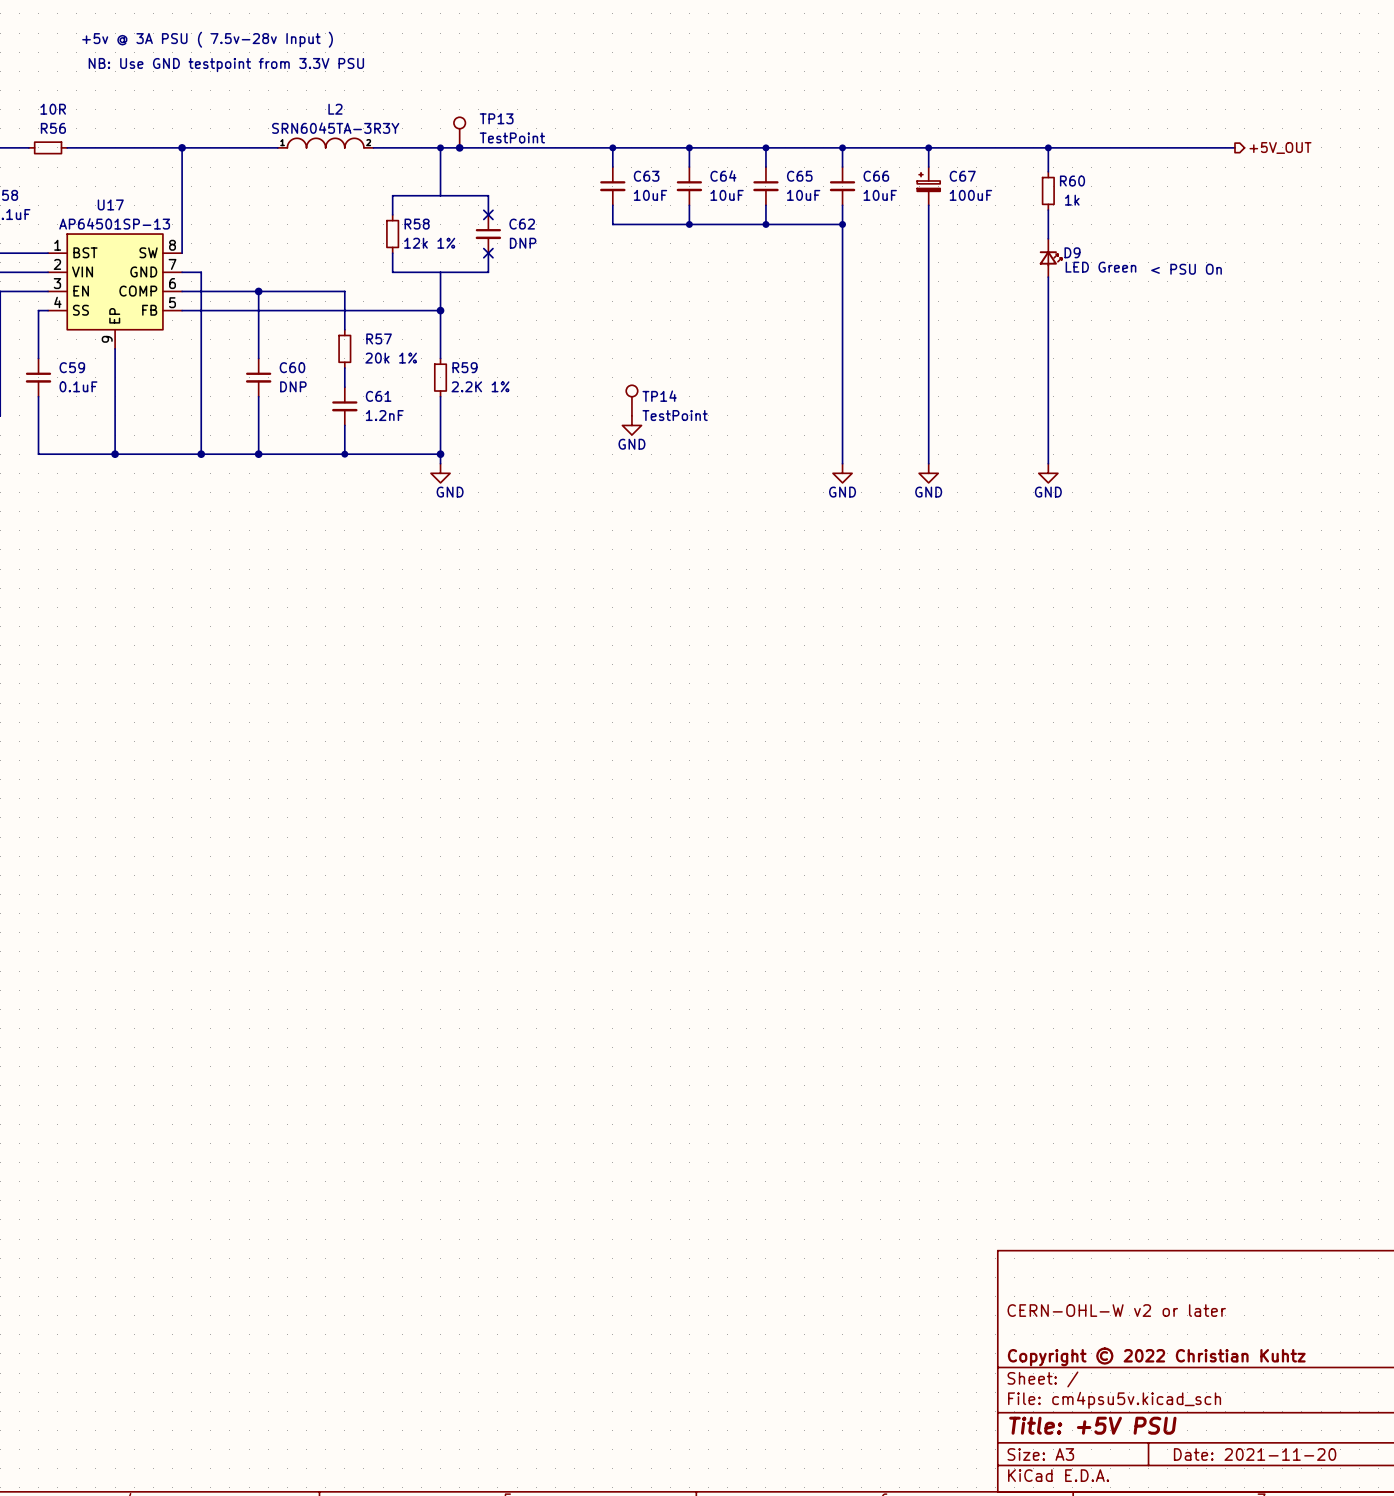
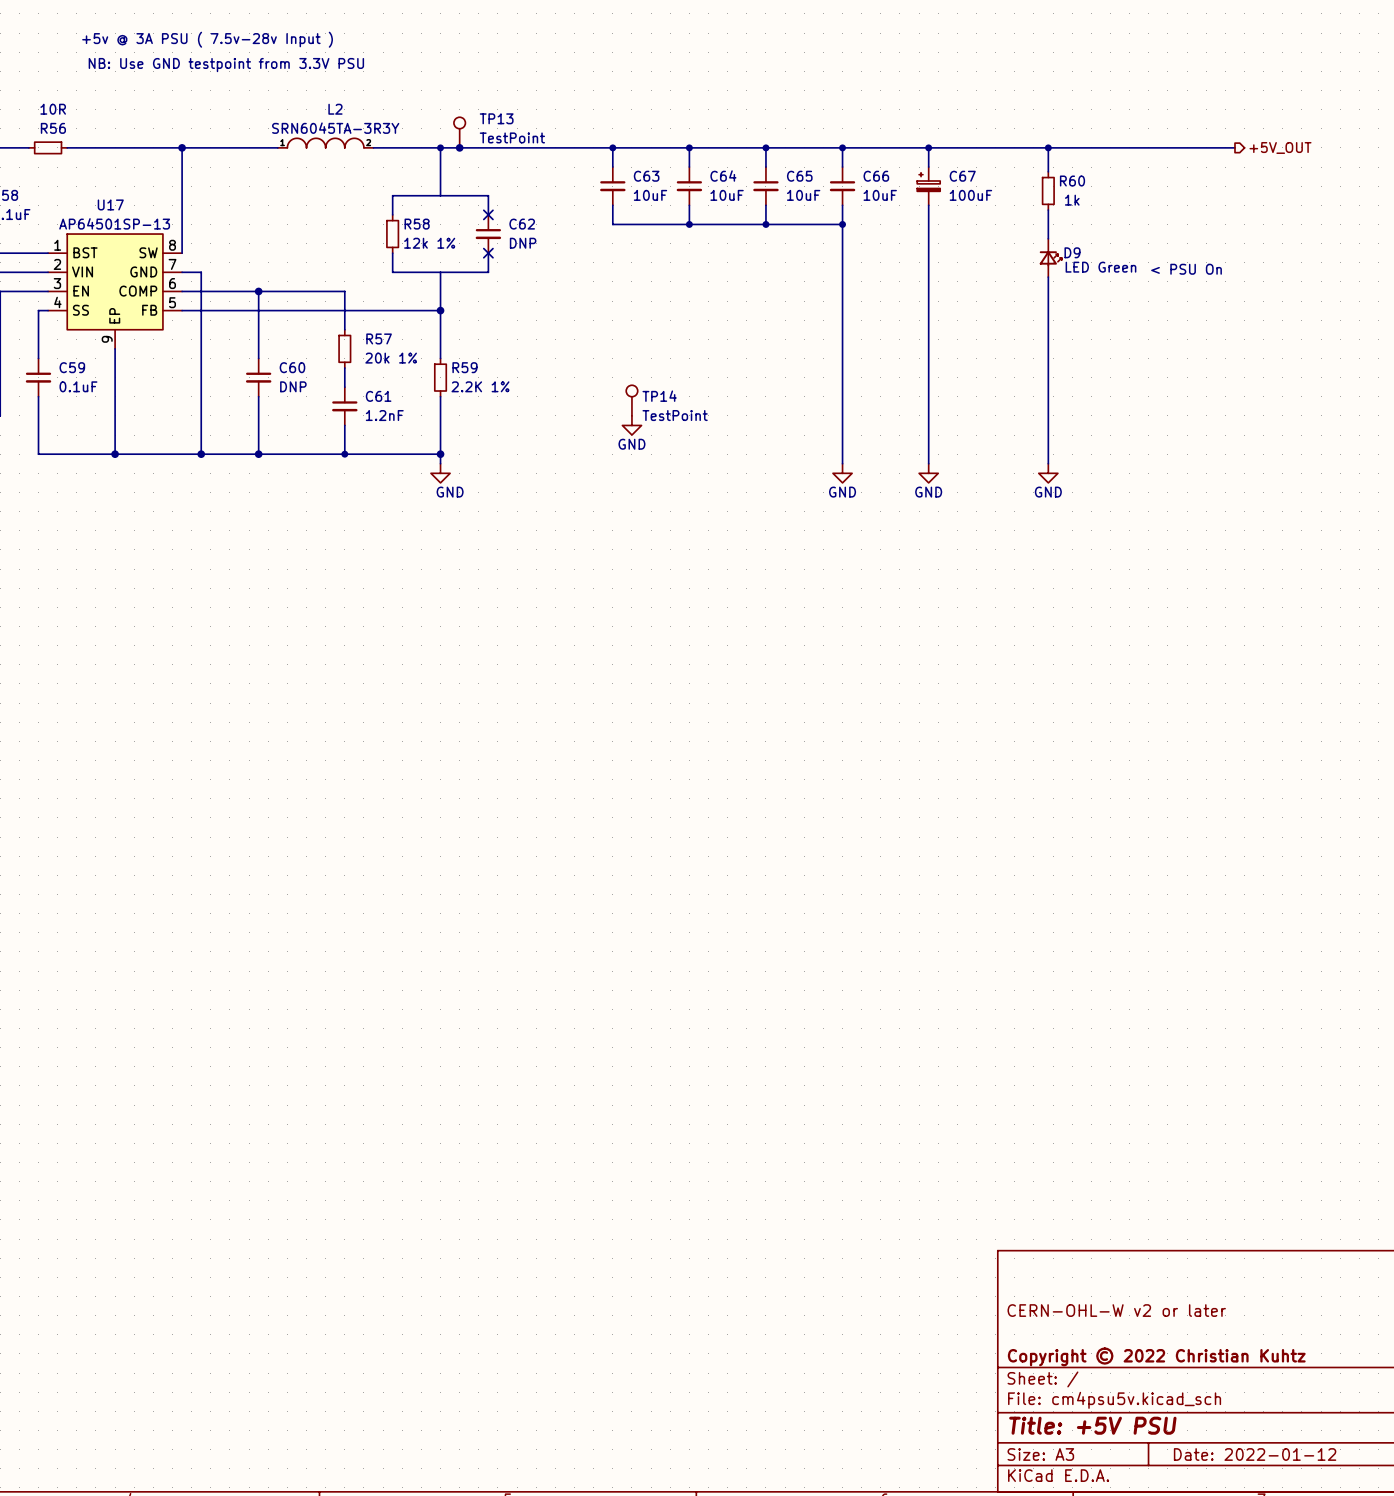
title block: Date: 2021-11-20 (1255, 1454) -> Date: 2022-01-12 (1255, 1454)

